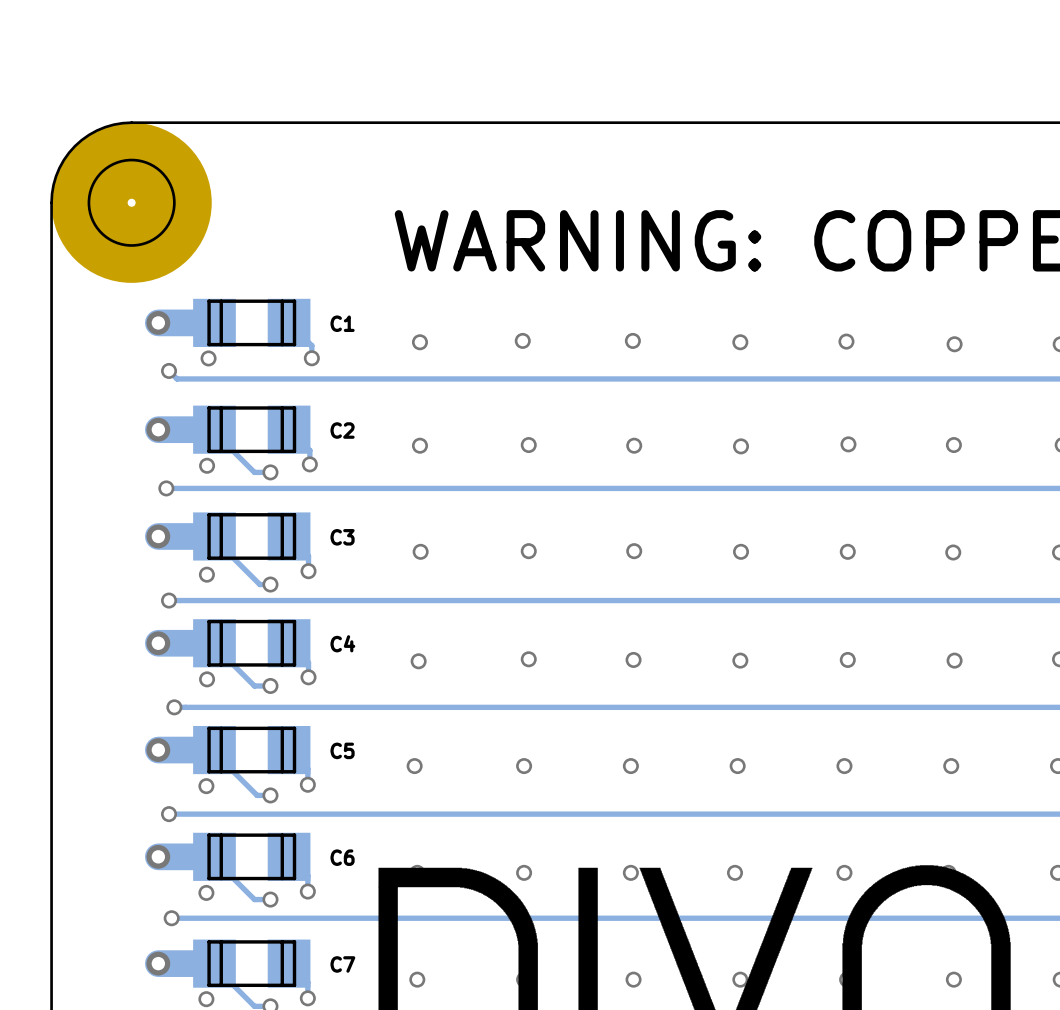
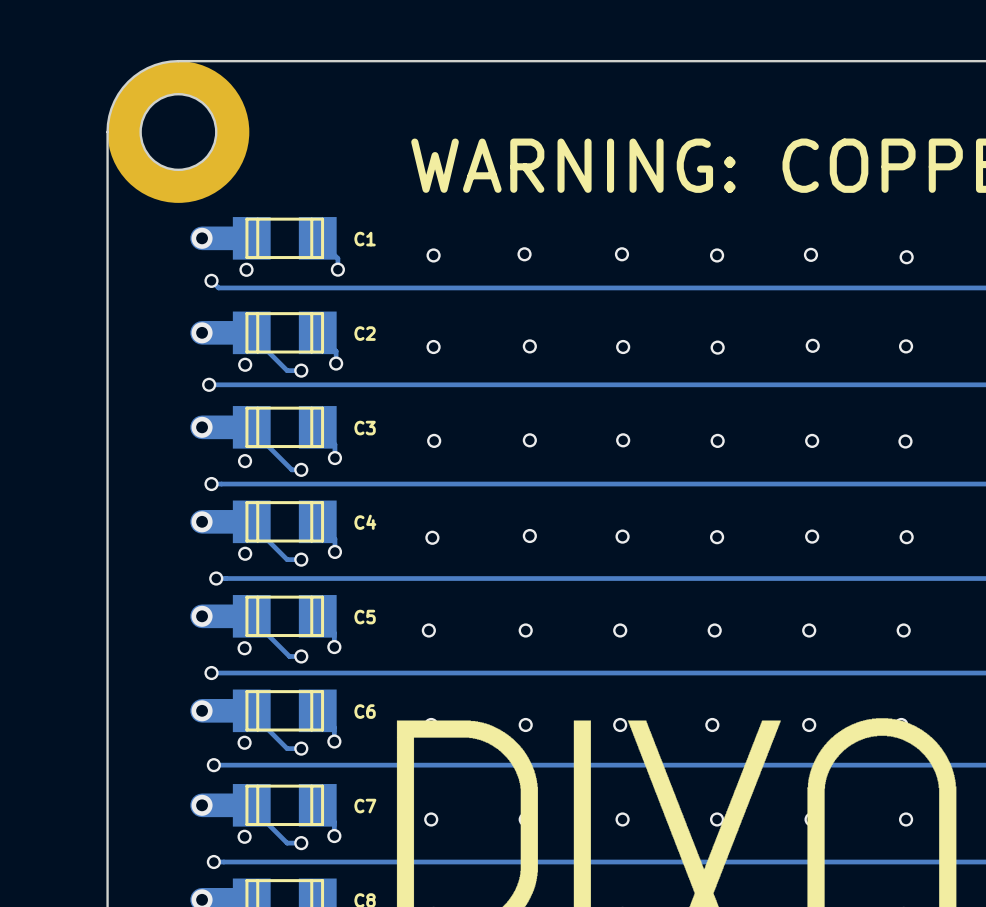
part footprint: [51, 122, 212, 283] -> [107, 61, 250, 203]

